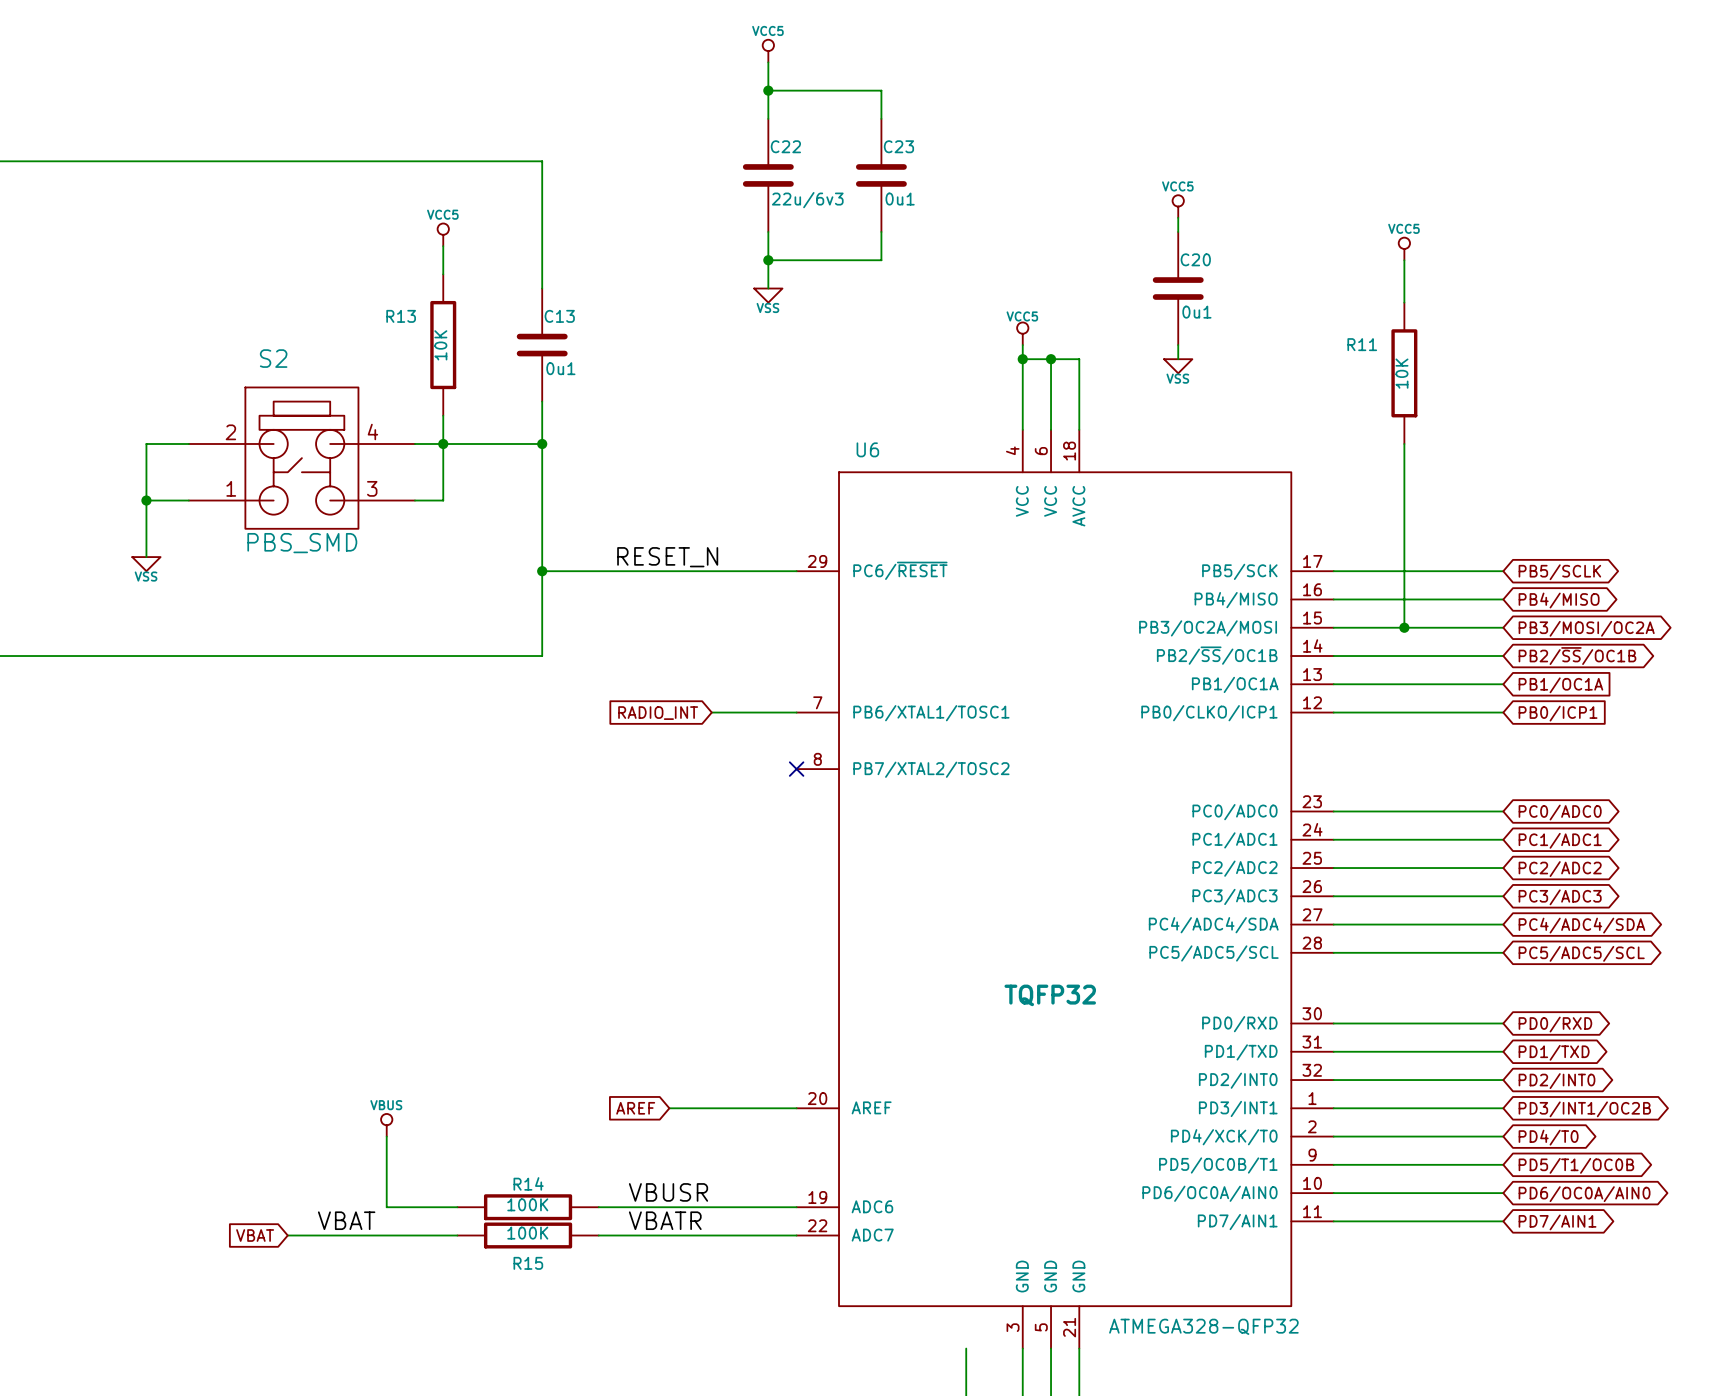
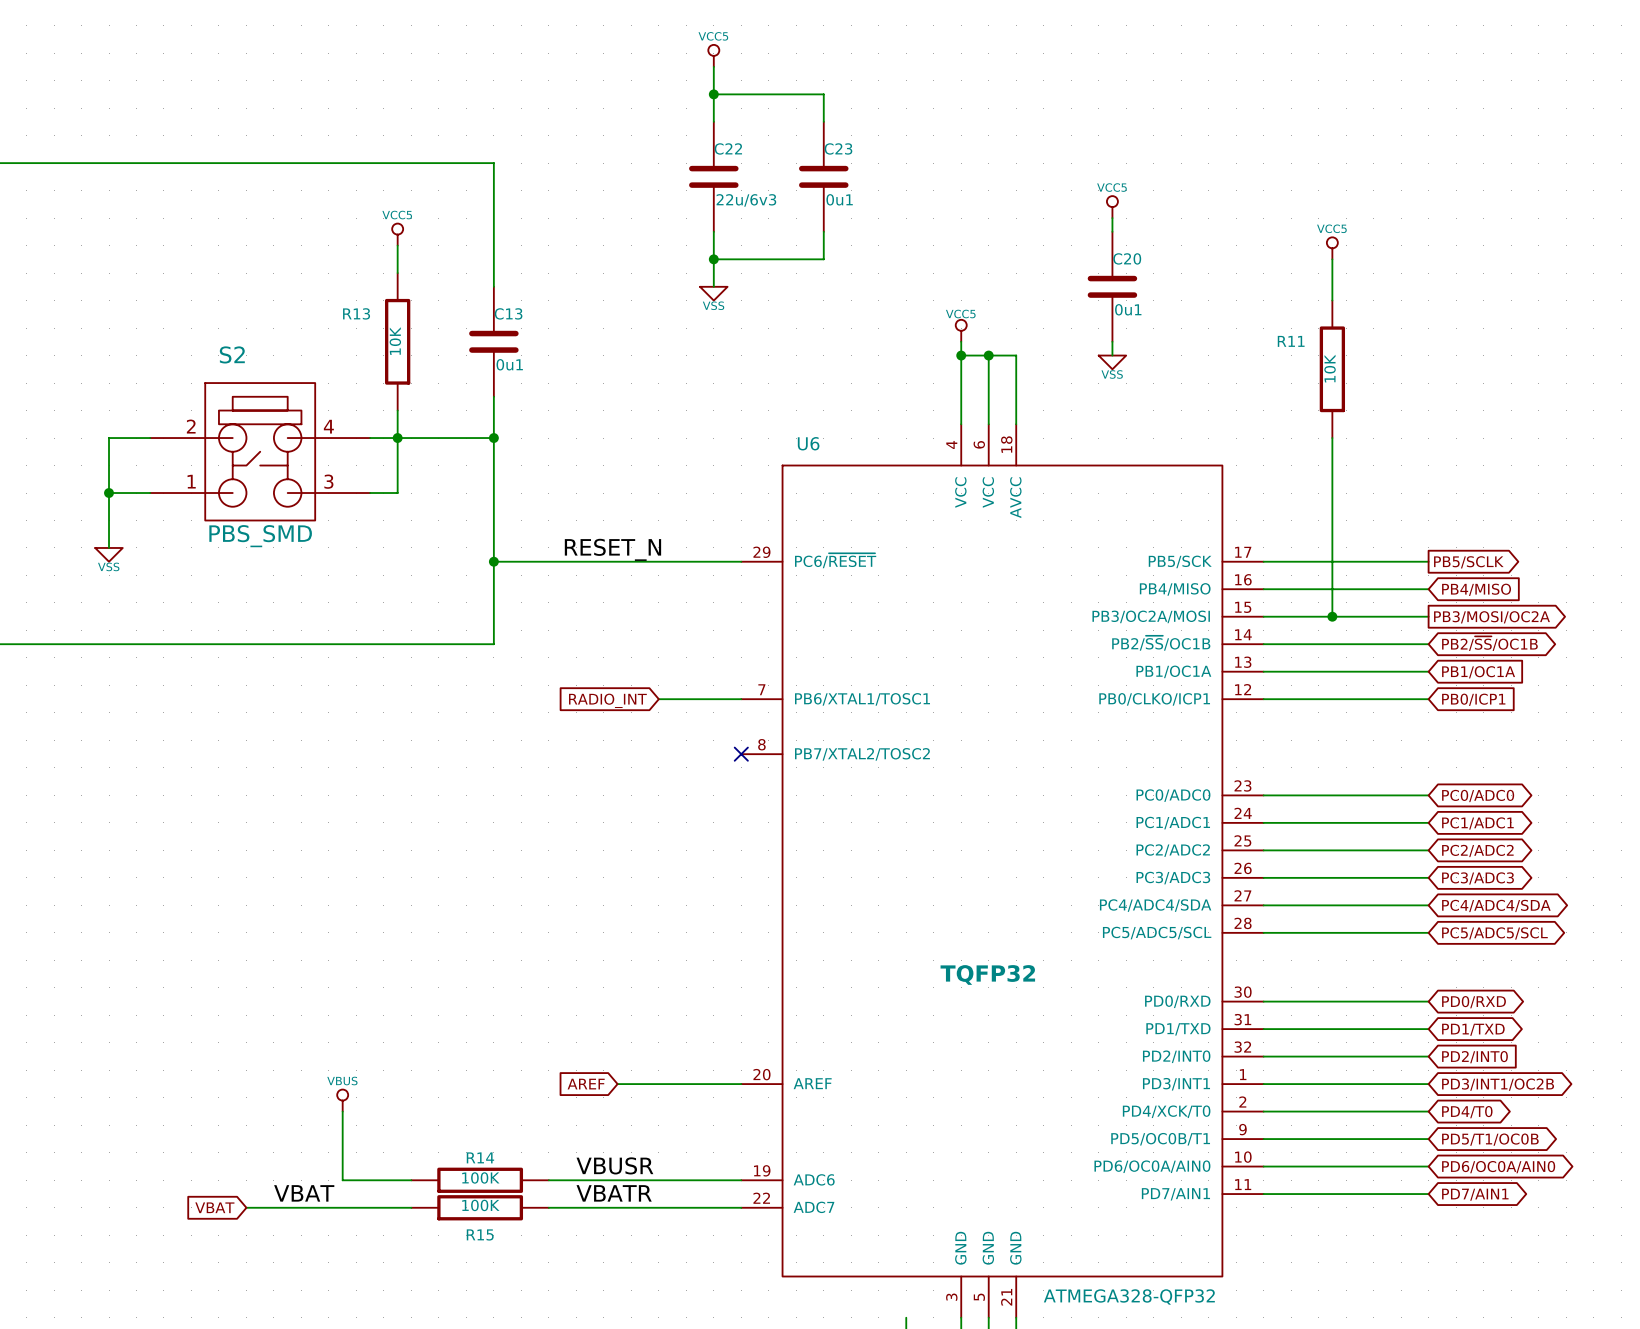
global label shape: bidirectional (1559, 572) -> output (1468, 562)
global label shape: bidirectional (1559, 600) -> input (1476, 589)
global label shape: bidirectional (1586, 628) -> output (1491, 617)
global label shape: bidirectional (1556, 1081) -> input (1474, 1057)

